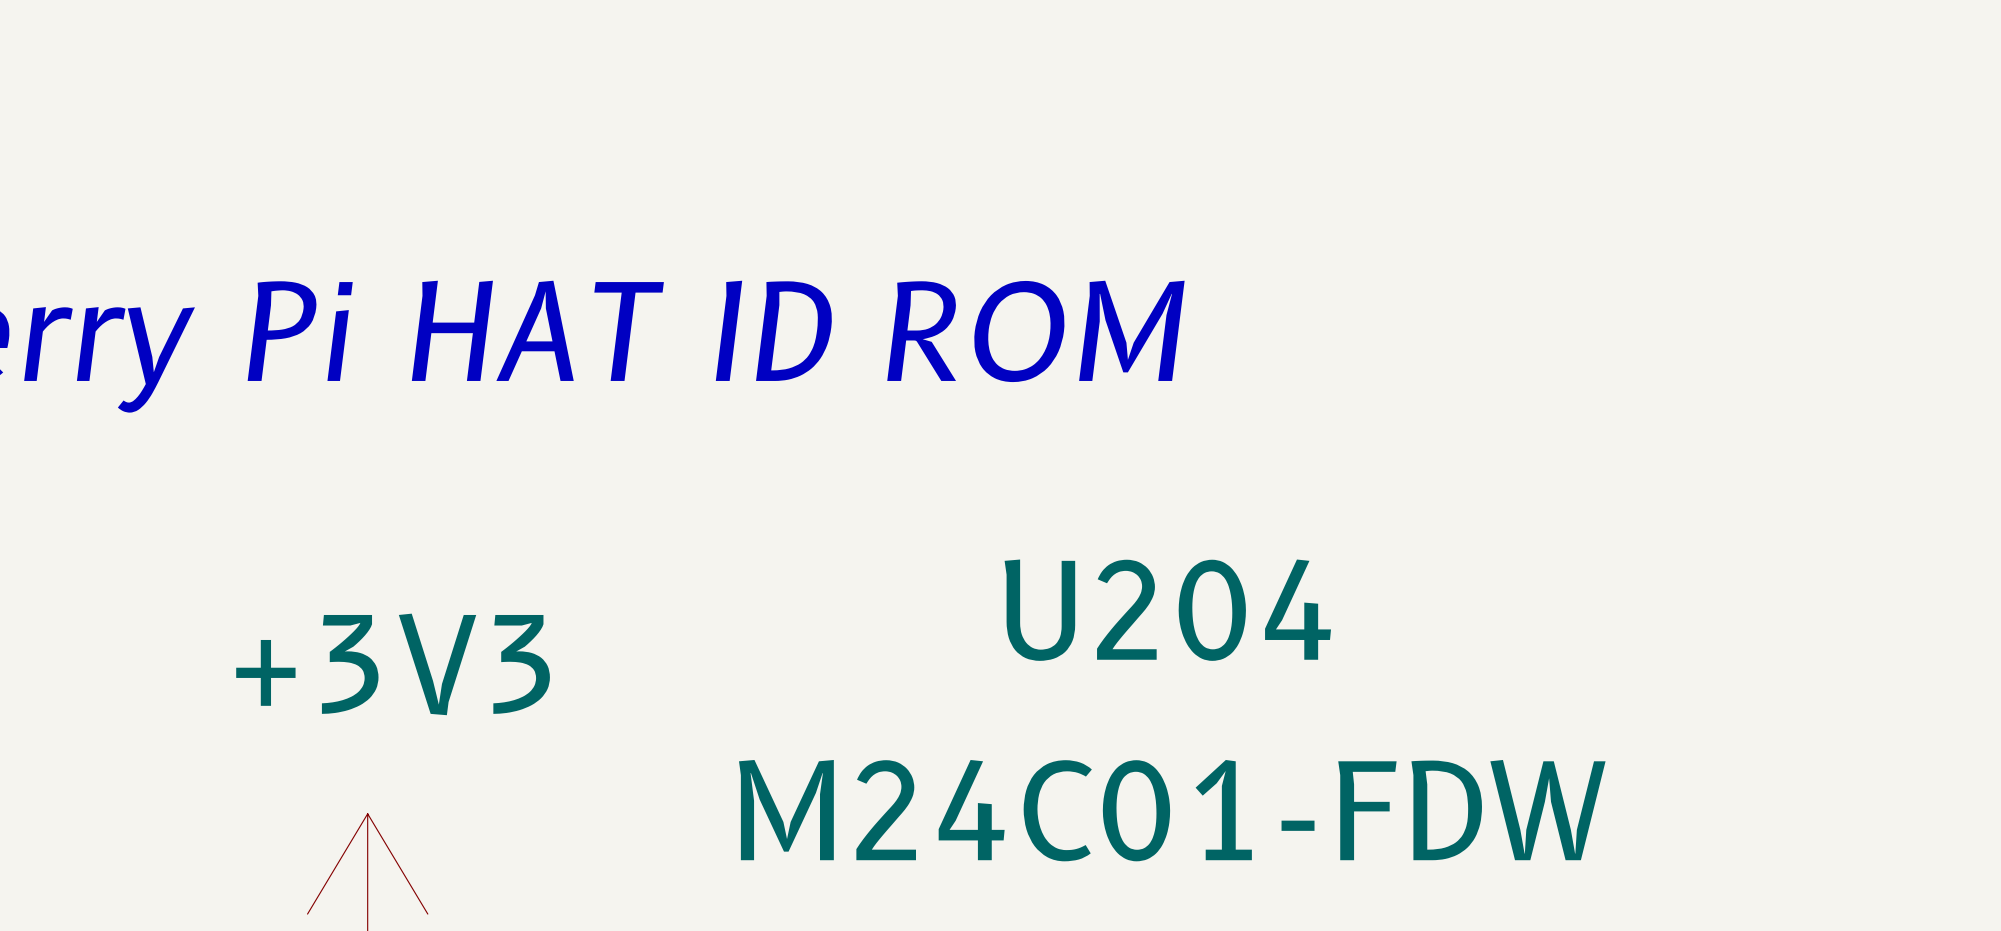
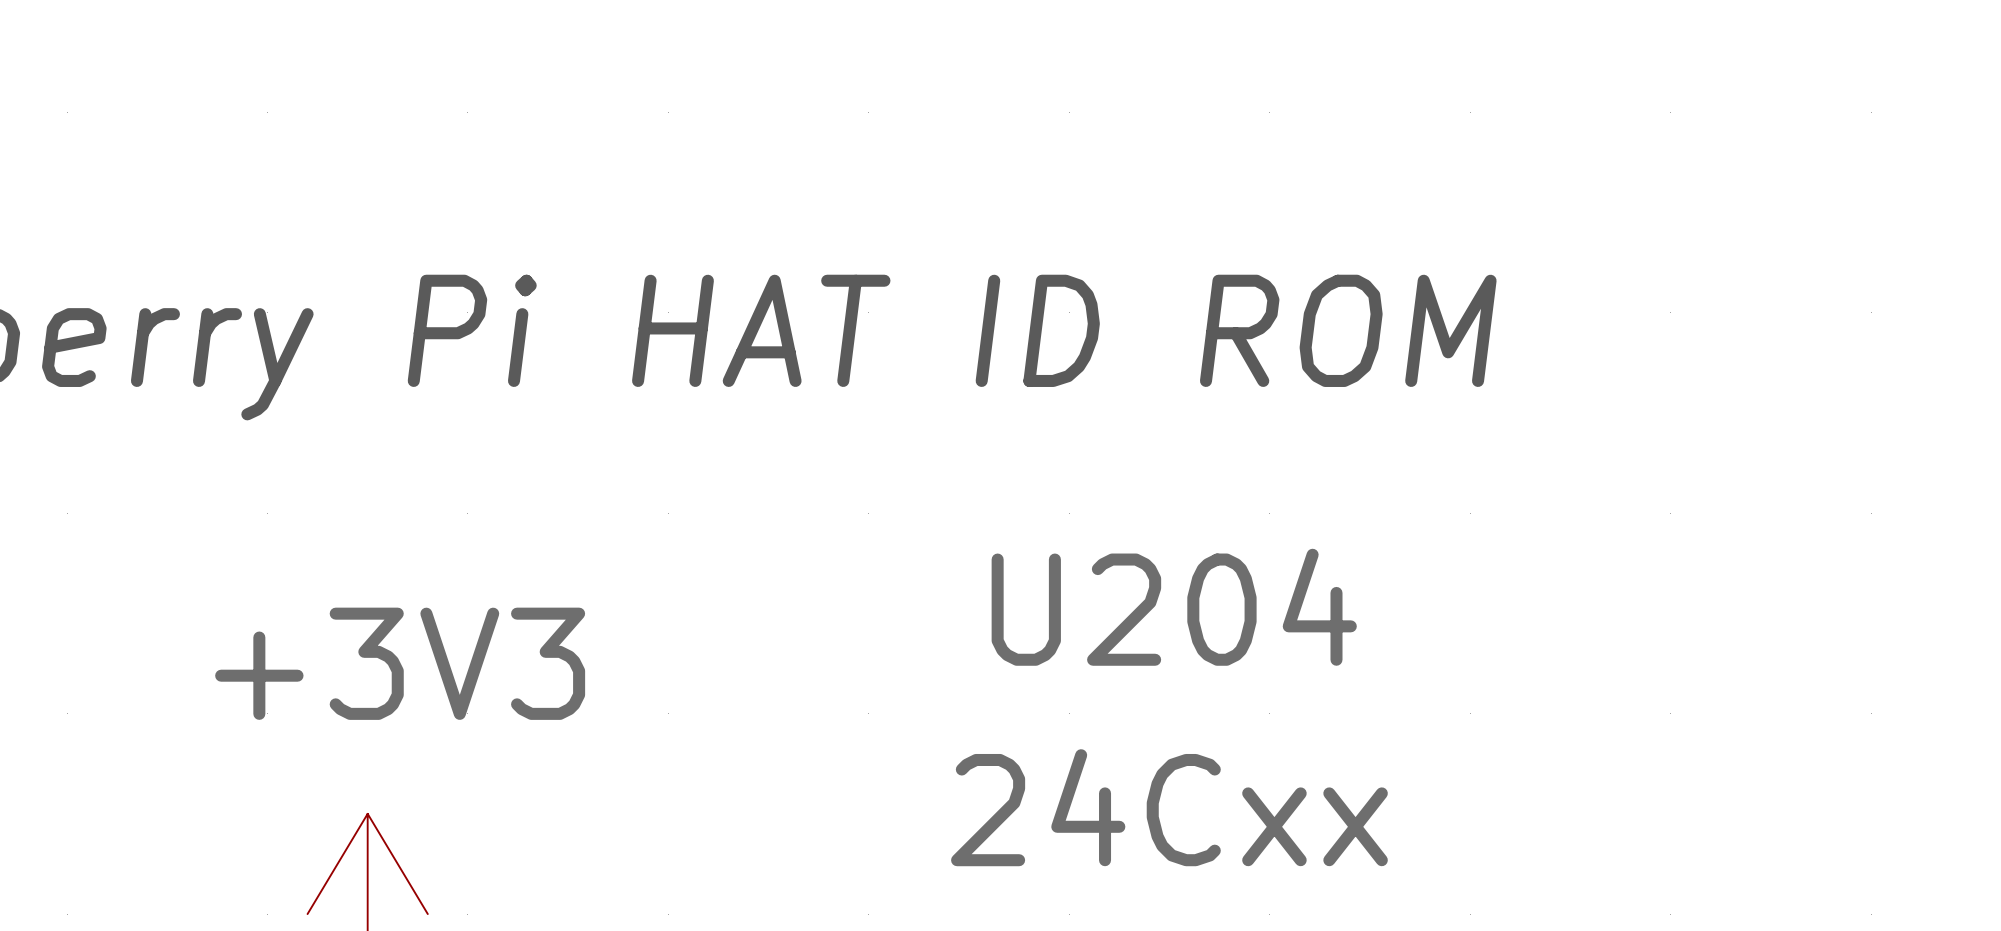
U204 value: M24C01-FDW (1172, 810) -> 24Cxx (1169, 807)

